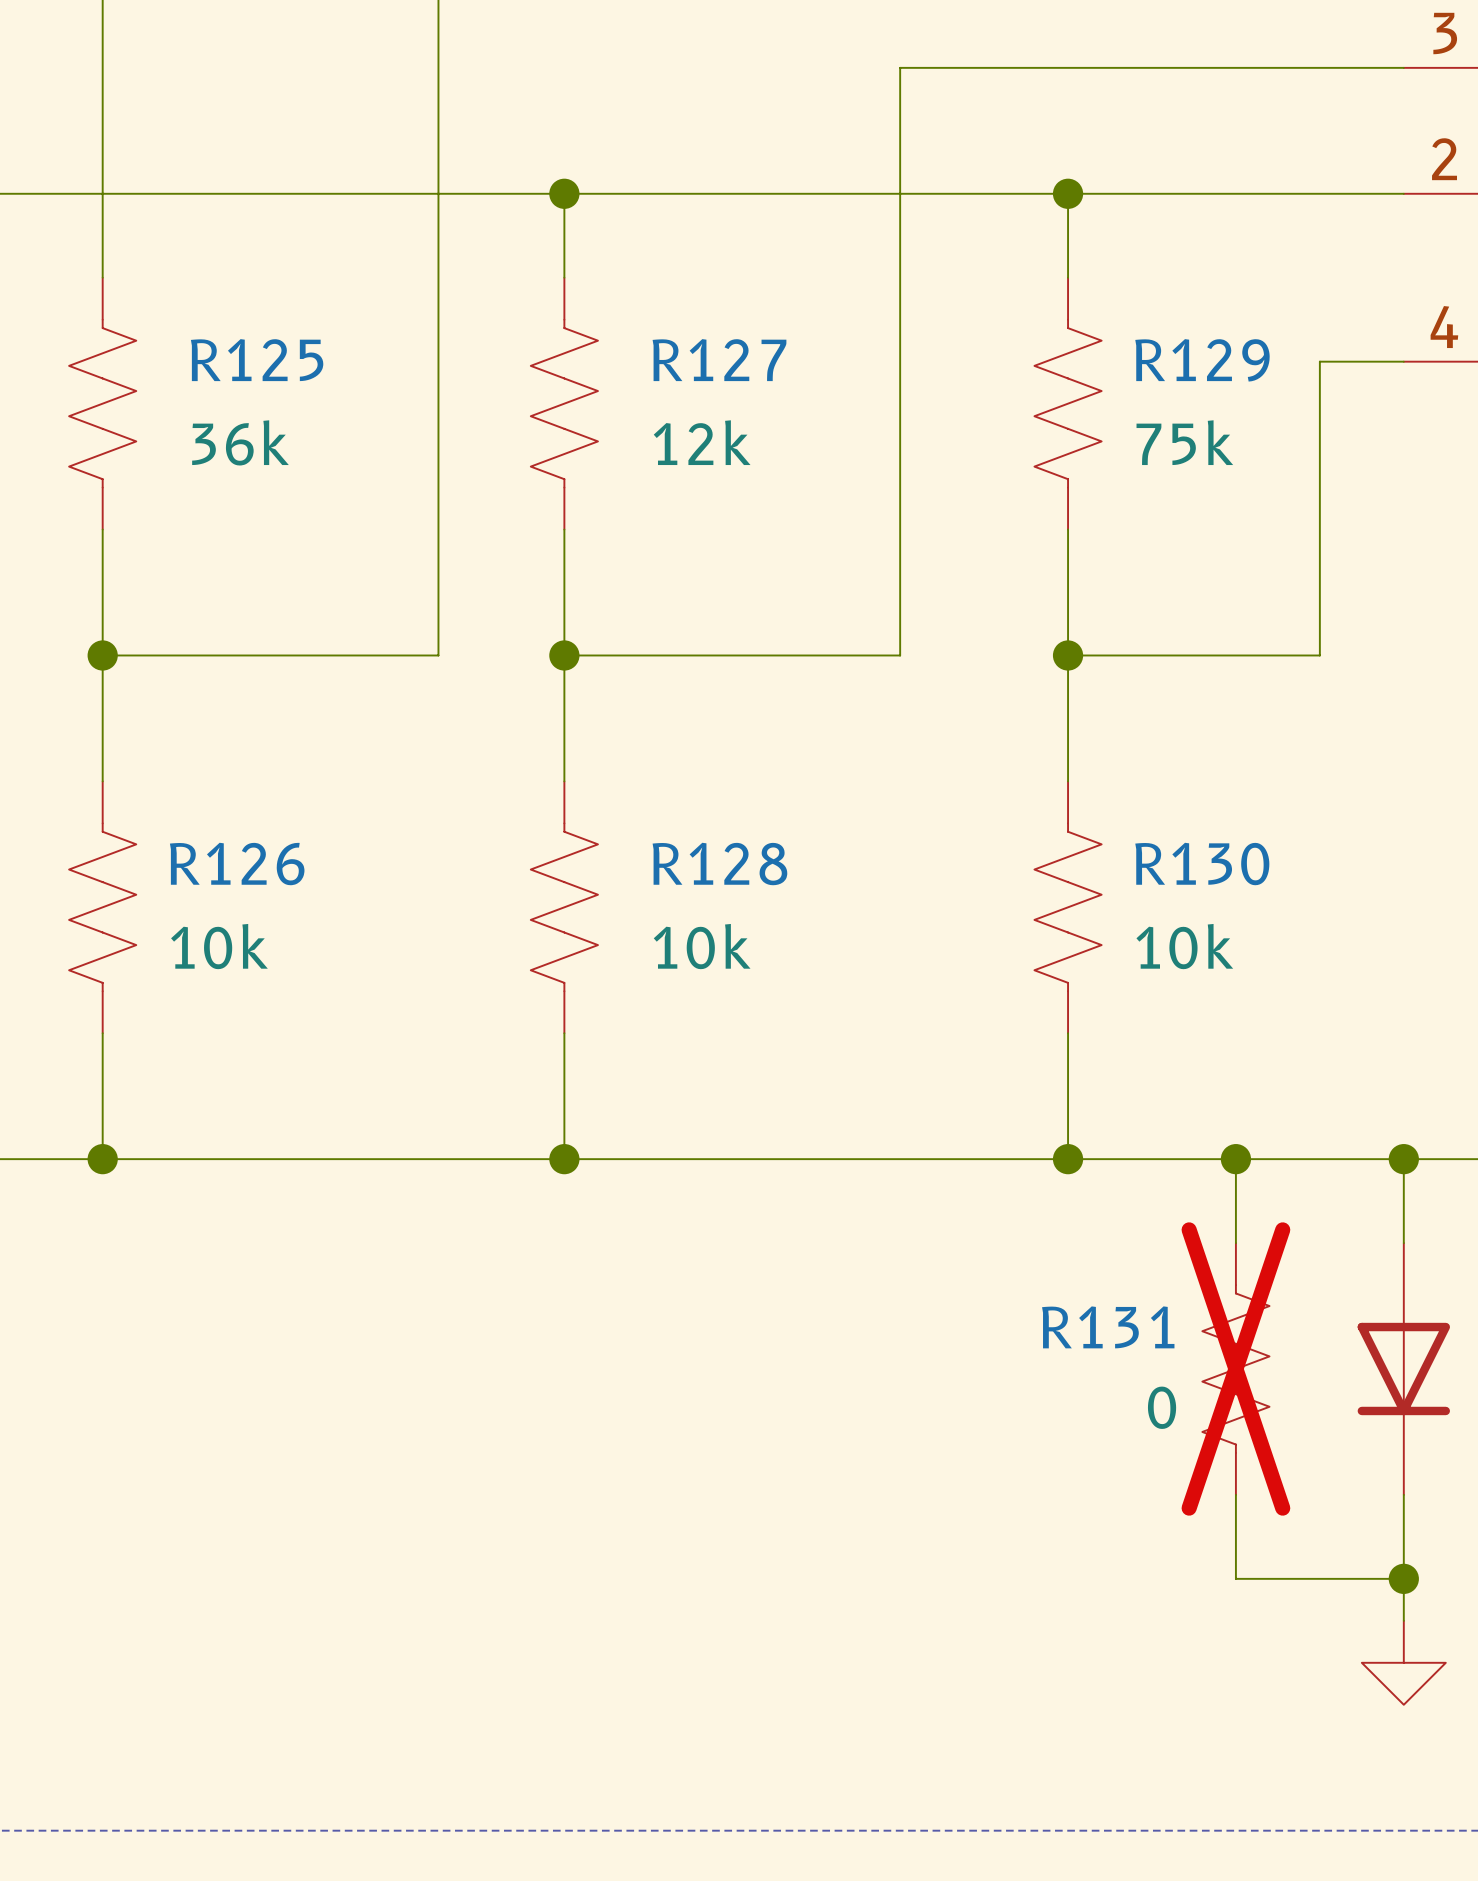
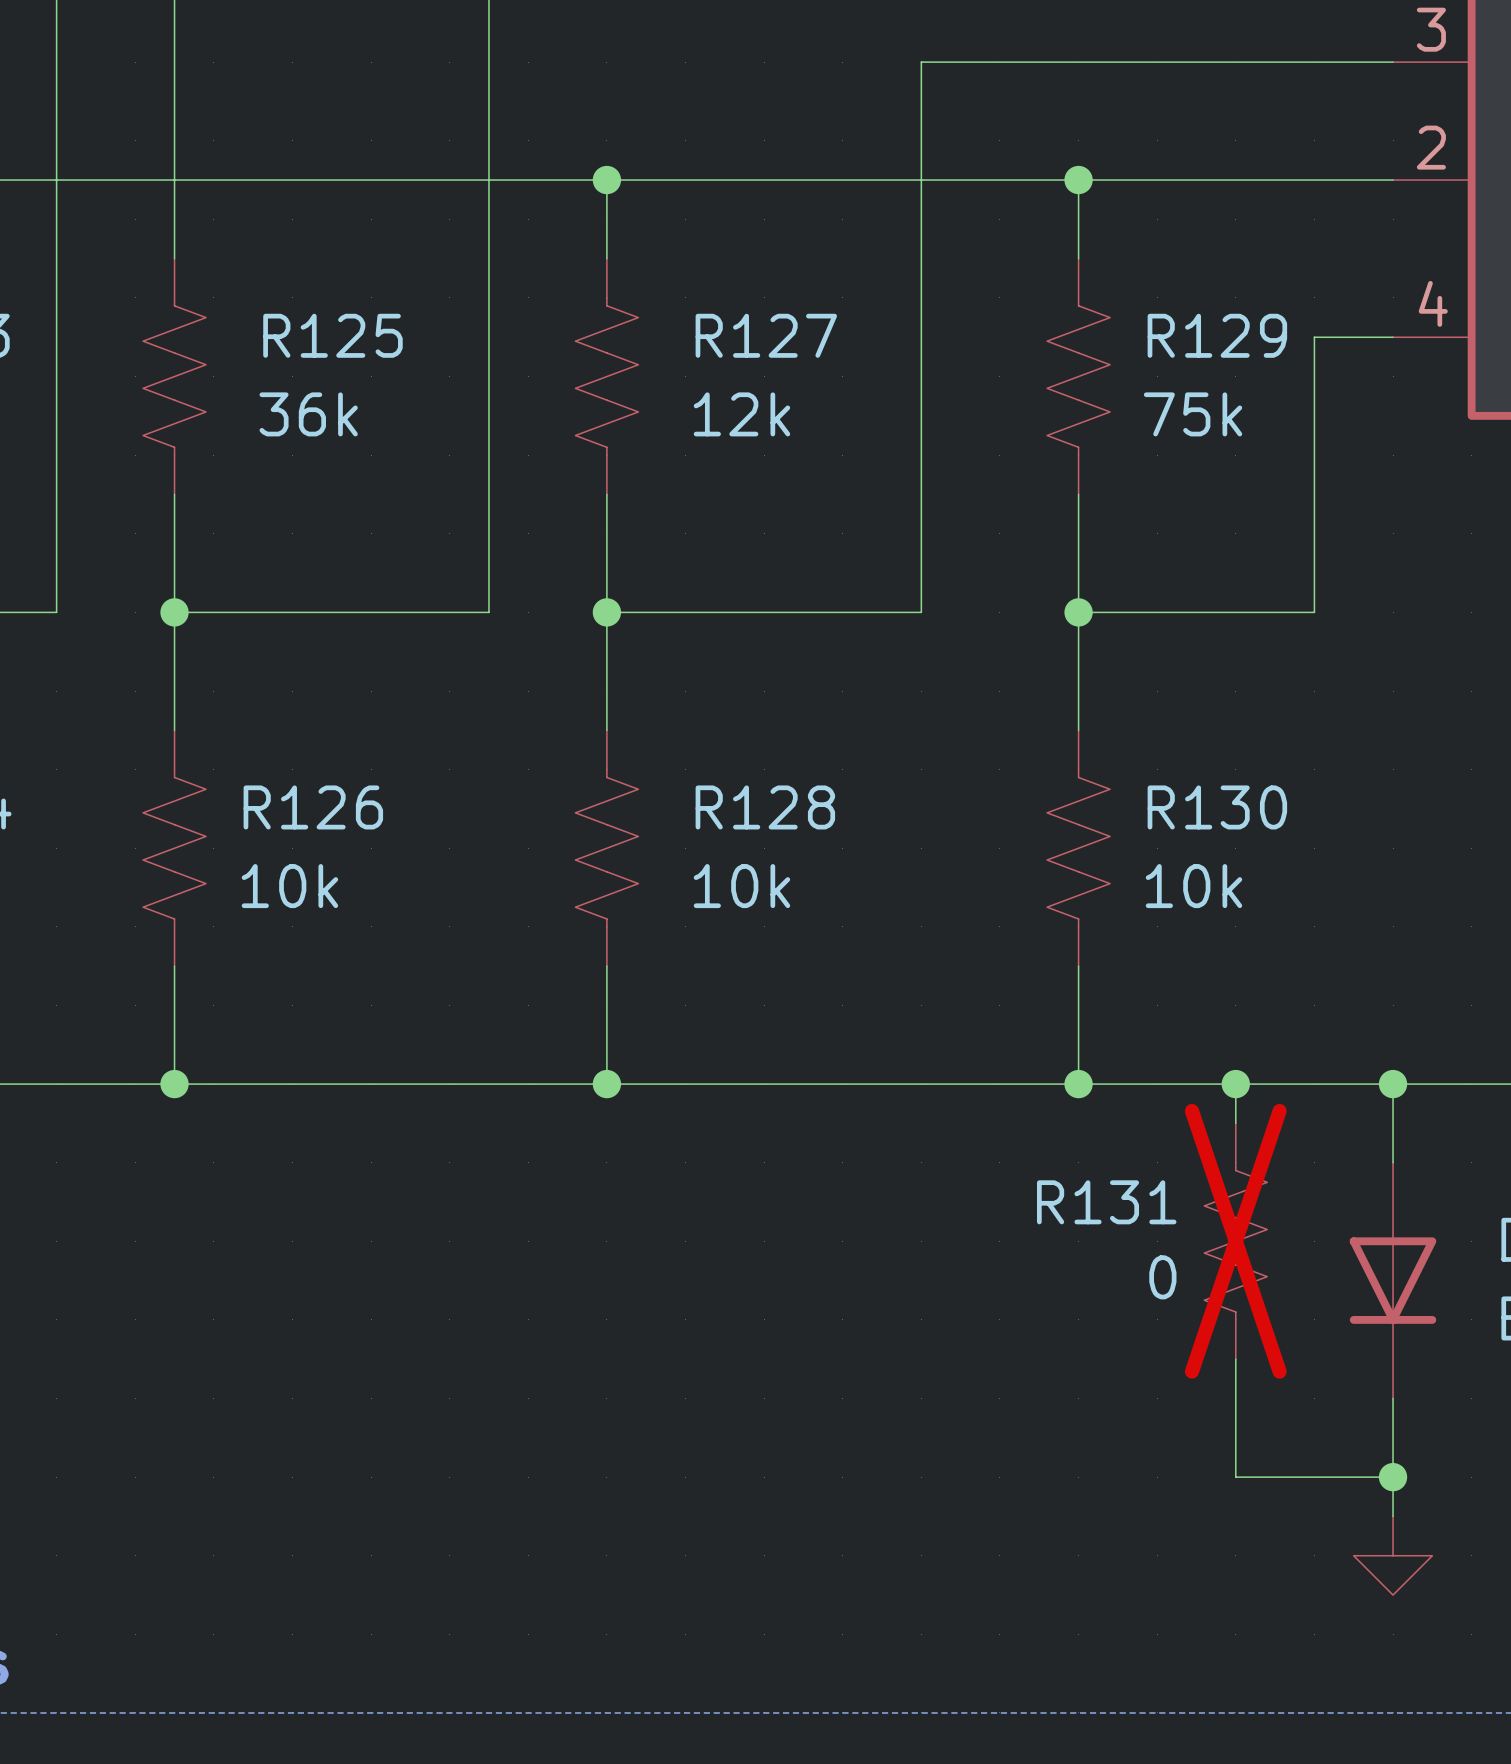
R131 position: (1235, 1369) -> (1235, 1241)

